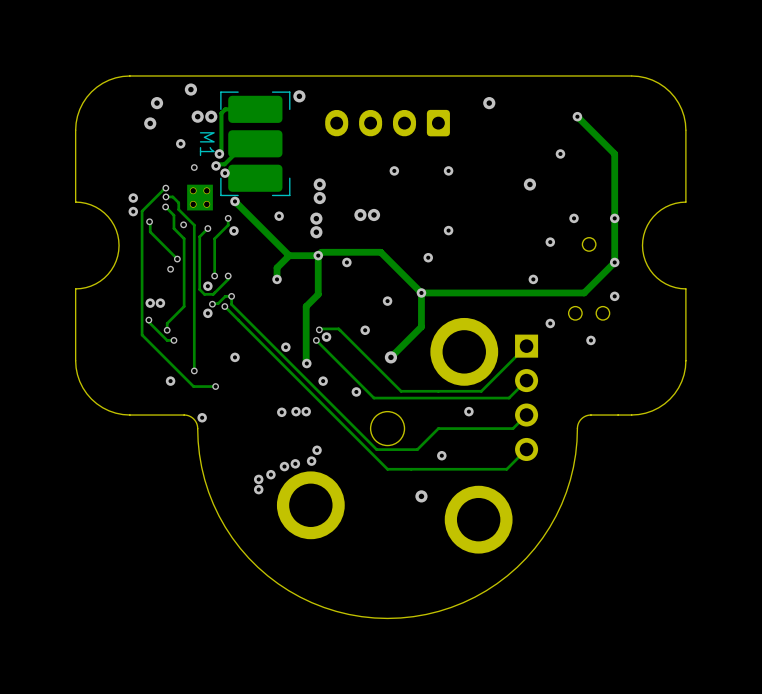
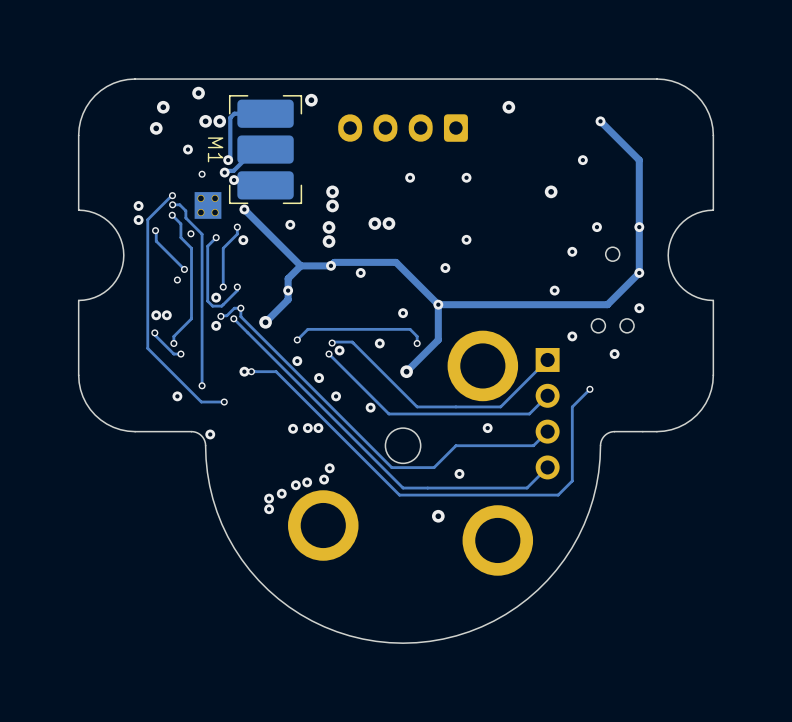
track: (318, 255) (318, 294) (306, 306) (306, 362) -> none
track: none -> (288, 290) (288, 299) (265, 322)
via: none -> (265, 322)
track: none -> (297, 339) (307, 329) (410, 329) (417, 336) (417, 343)
via: none -> (297, 339)
via: none -> (417, 343)
track: none -> (251, 371) (276, 371) (399, 495) (558, 495) (572, 480) (572, 406) (589, 389)
via: none -> (251, 371)
via: none -> (589, 389)

